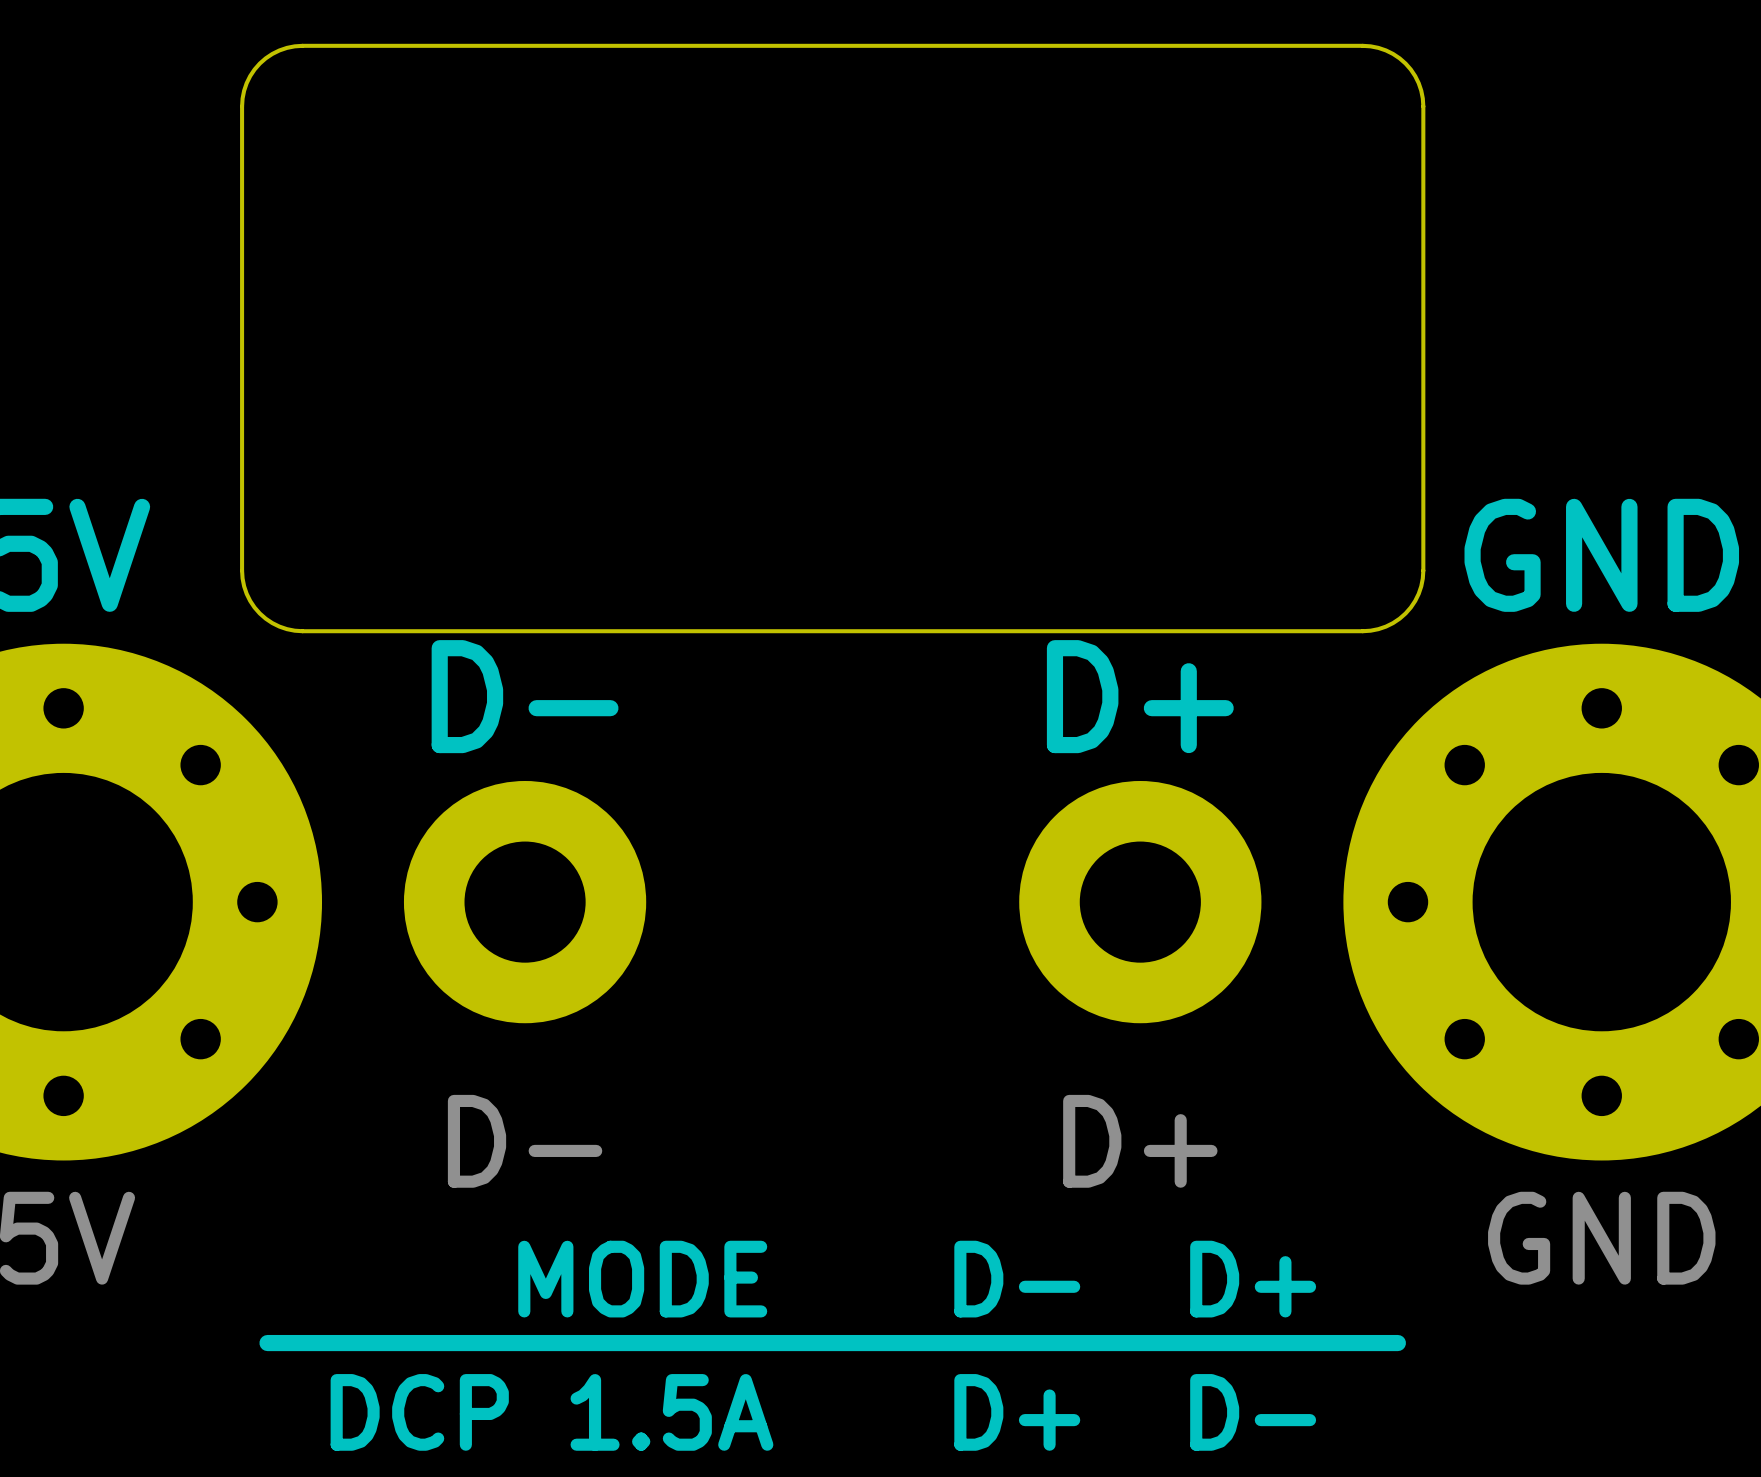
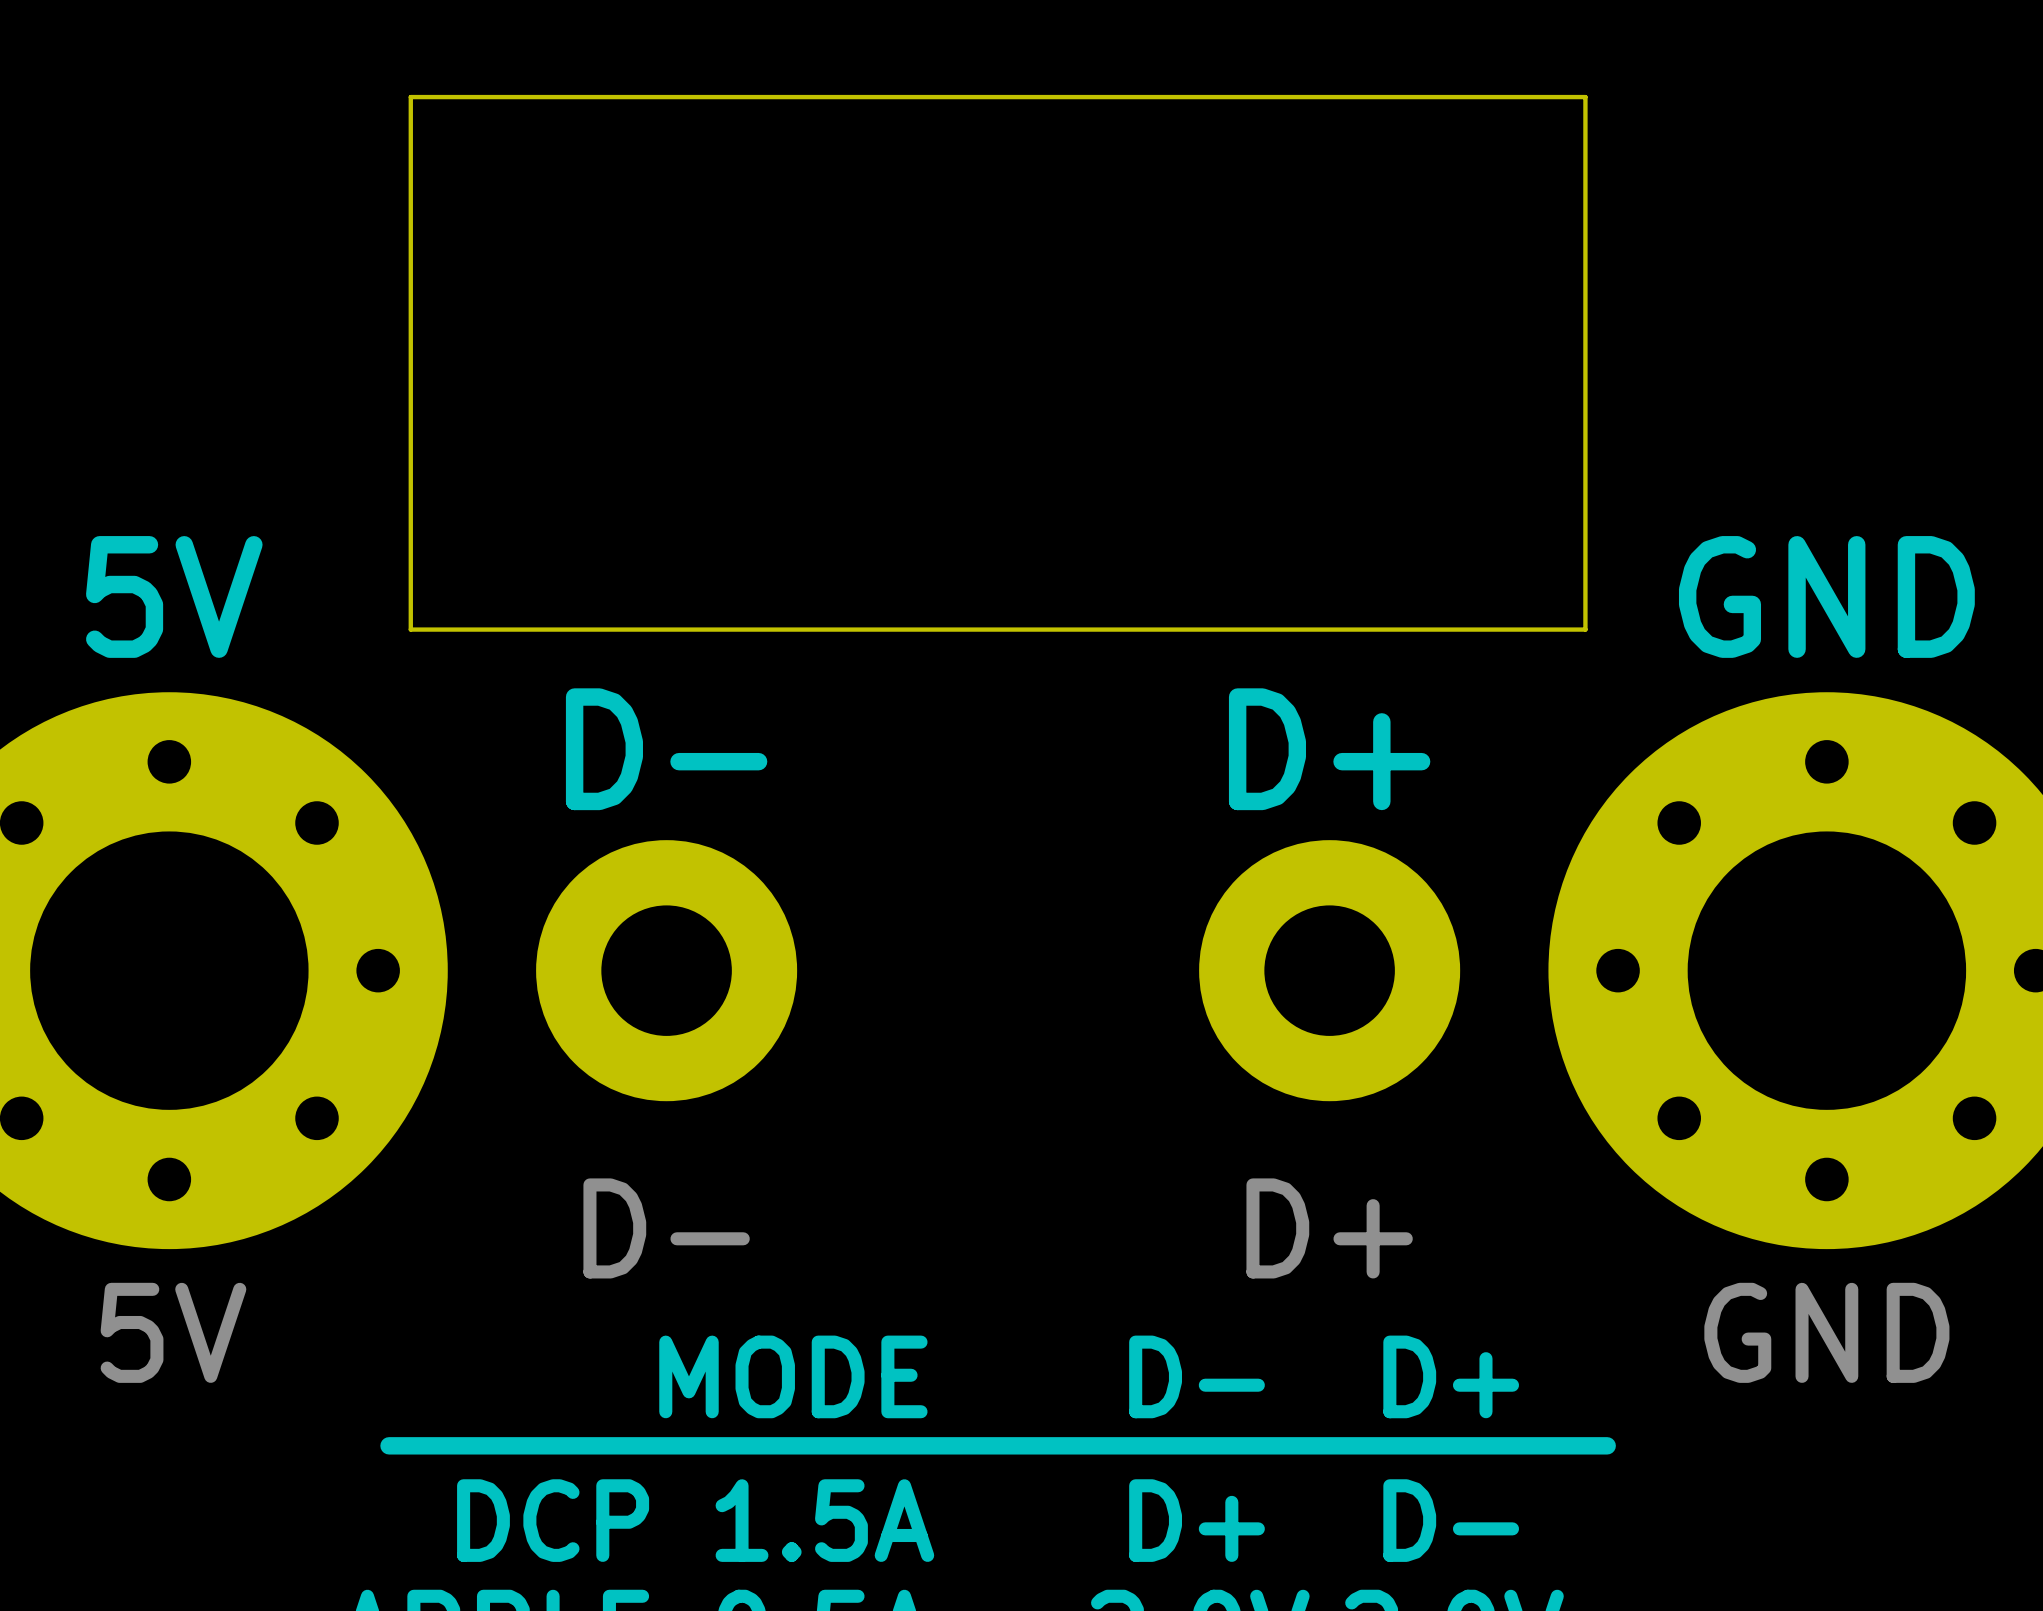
board edge: (302, 45) (1362, 45) (1378, 47) (1393, 53) (1405, 63) (1415, 76) (1421, 90) (1423, 106) (1423, 570) (1421, 586) (1415, 600) (1405, 613) (1393, 623) (1378, 629) (1362, 631) (302, 631) (286, 629) (272, 623) (259, 613) (250, 600) (244, 586) (242, 570) (242, 106) (246, 83) (259, 63) (279, 50) (302, 45) -> (410, 97) (410, 629) (1585, 629) (1585, 97) (410, 97)

